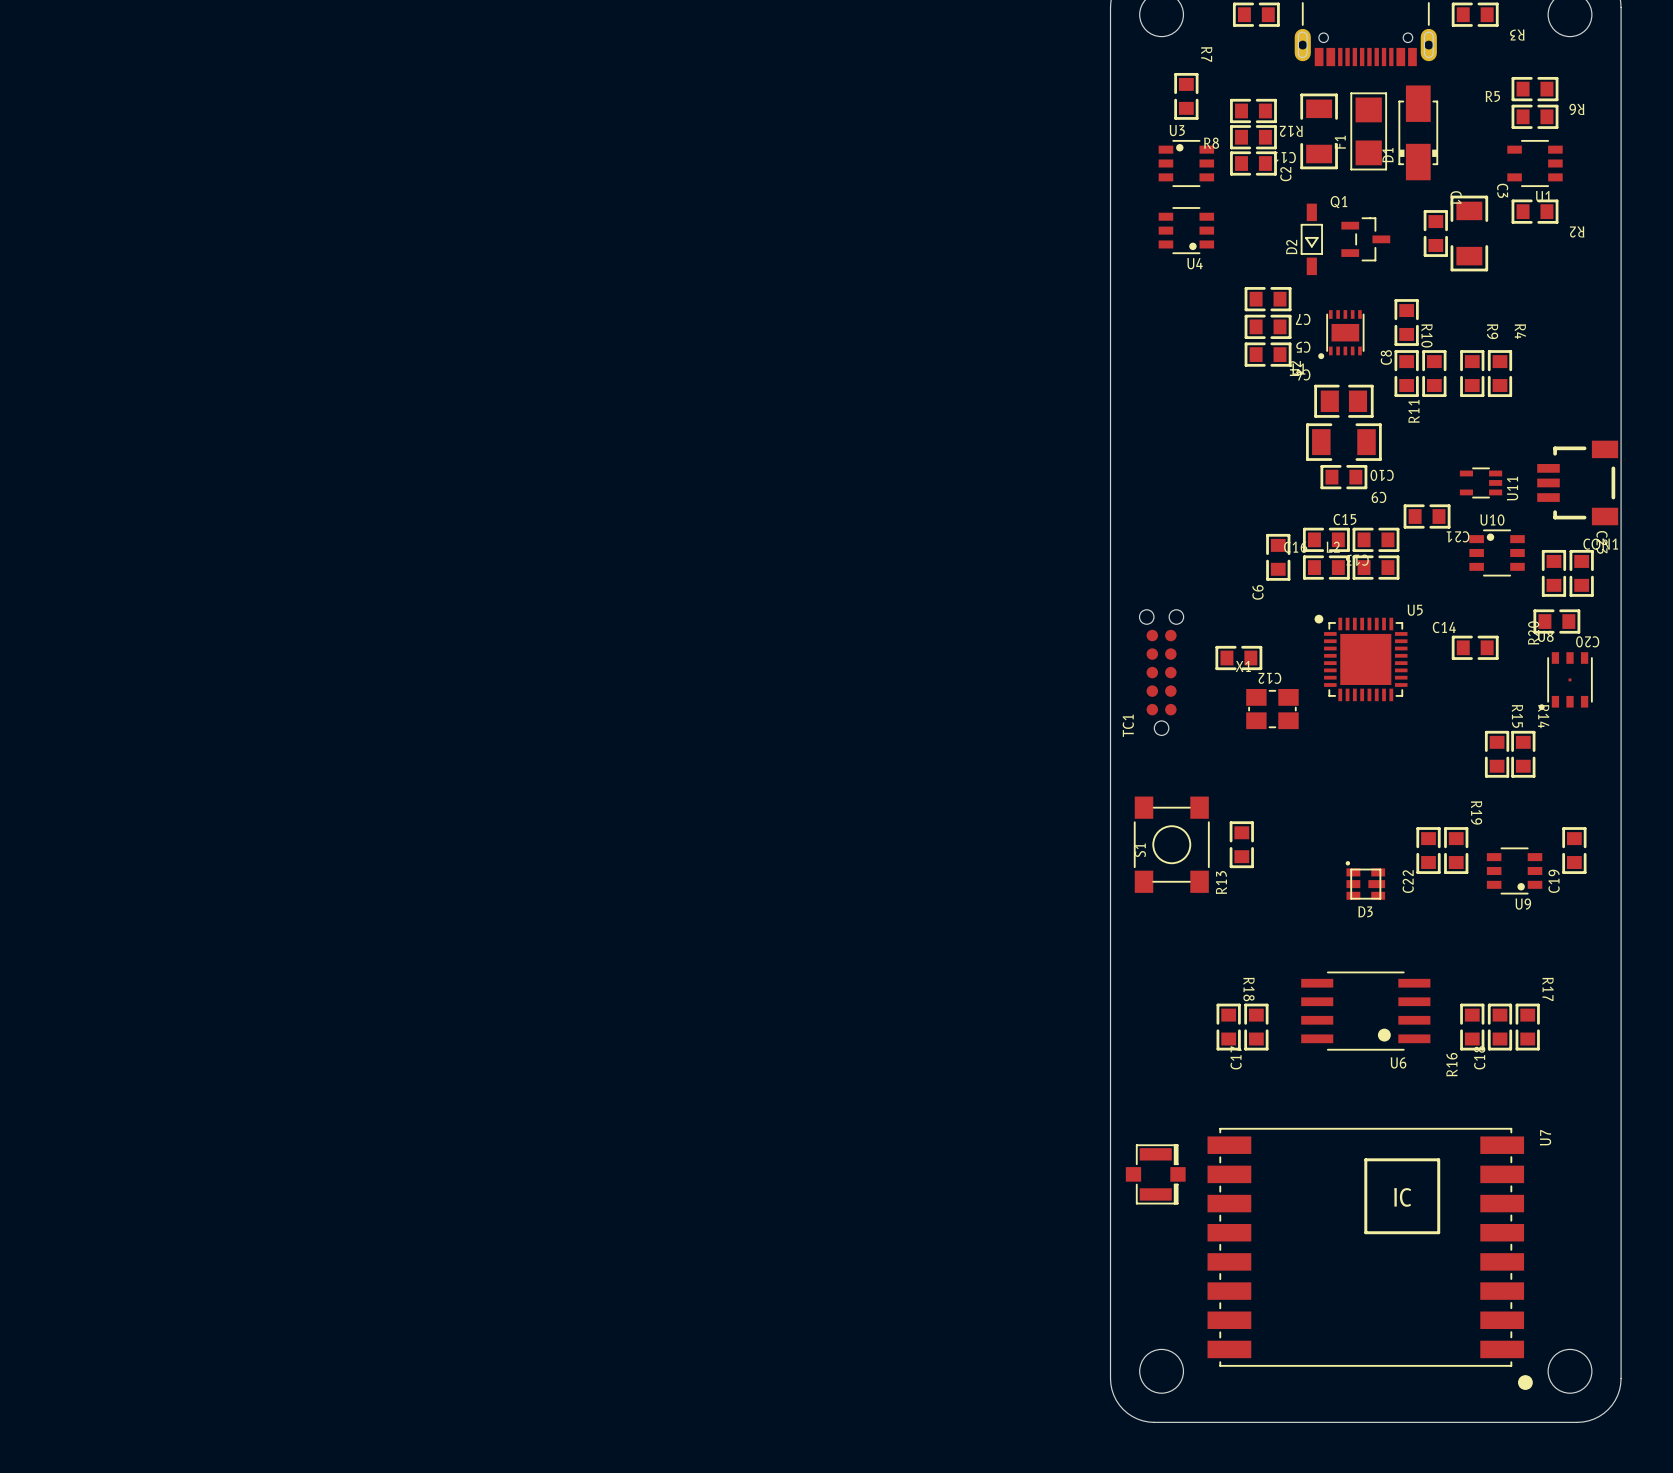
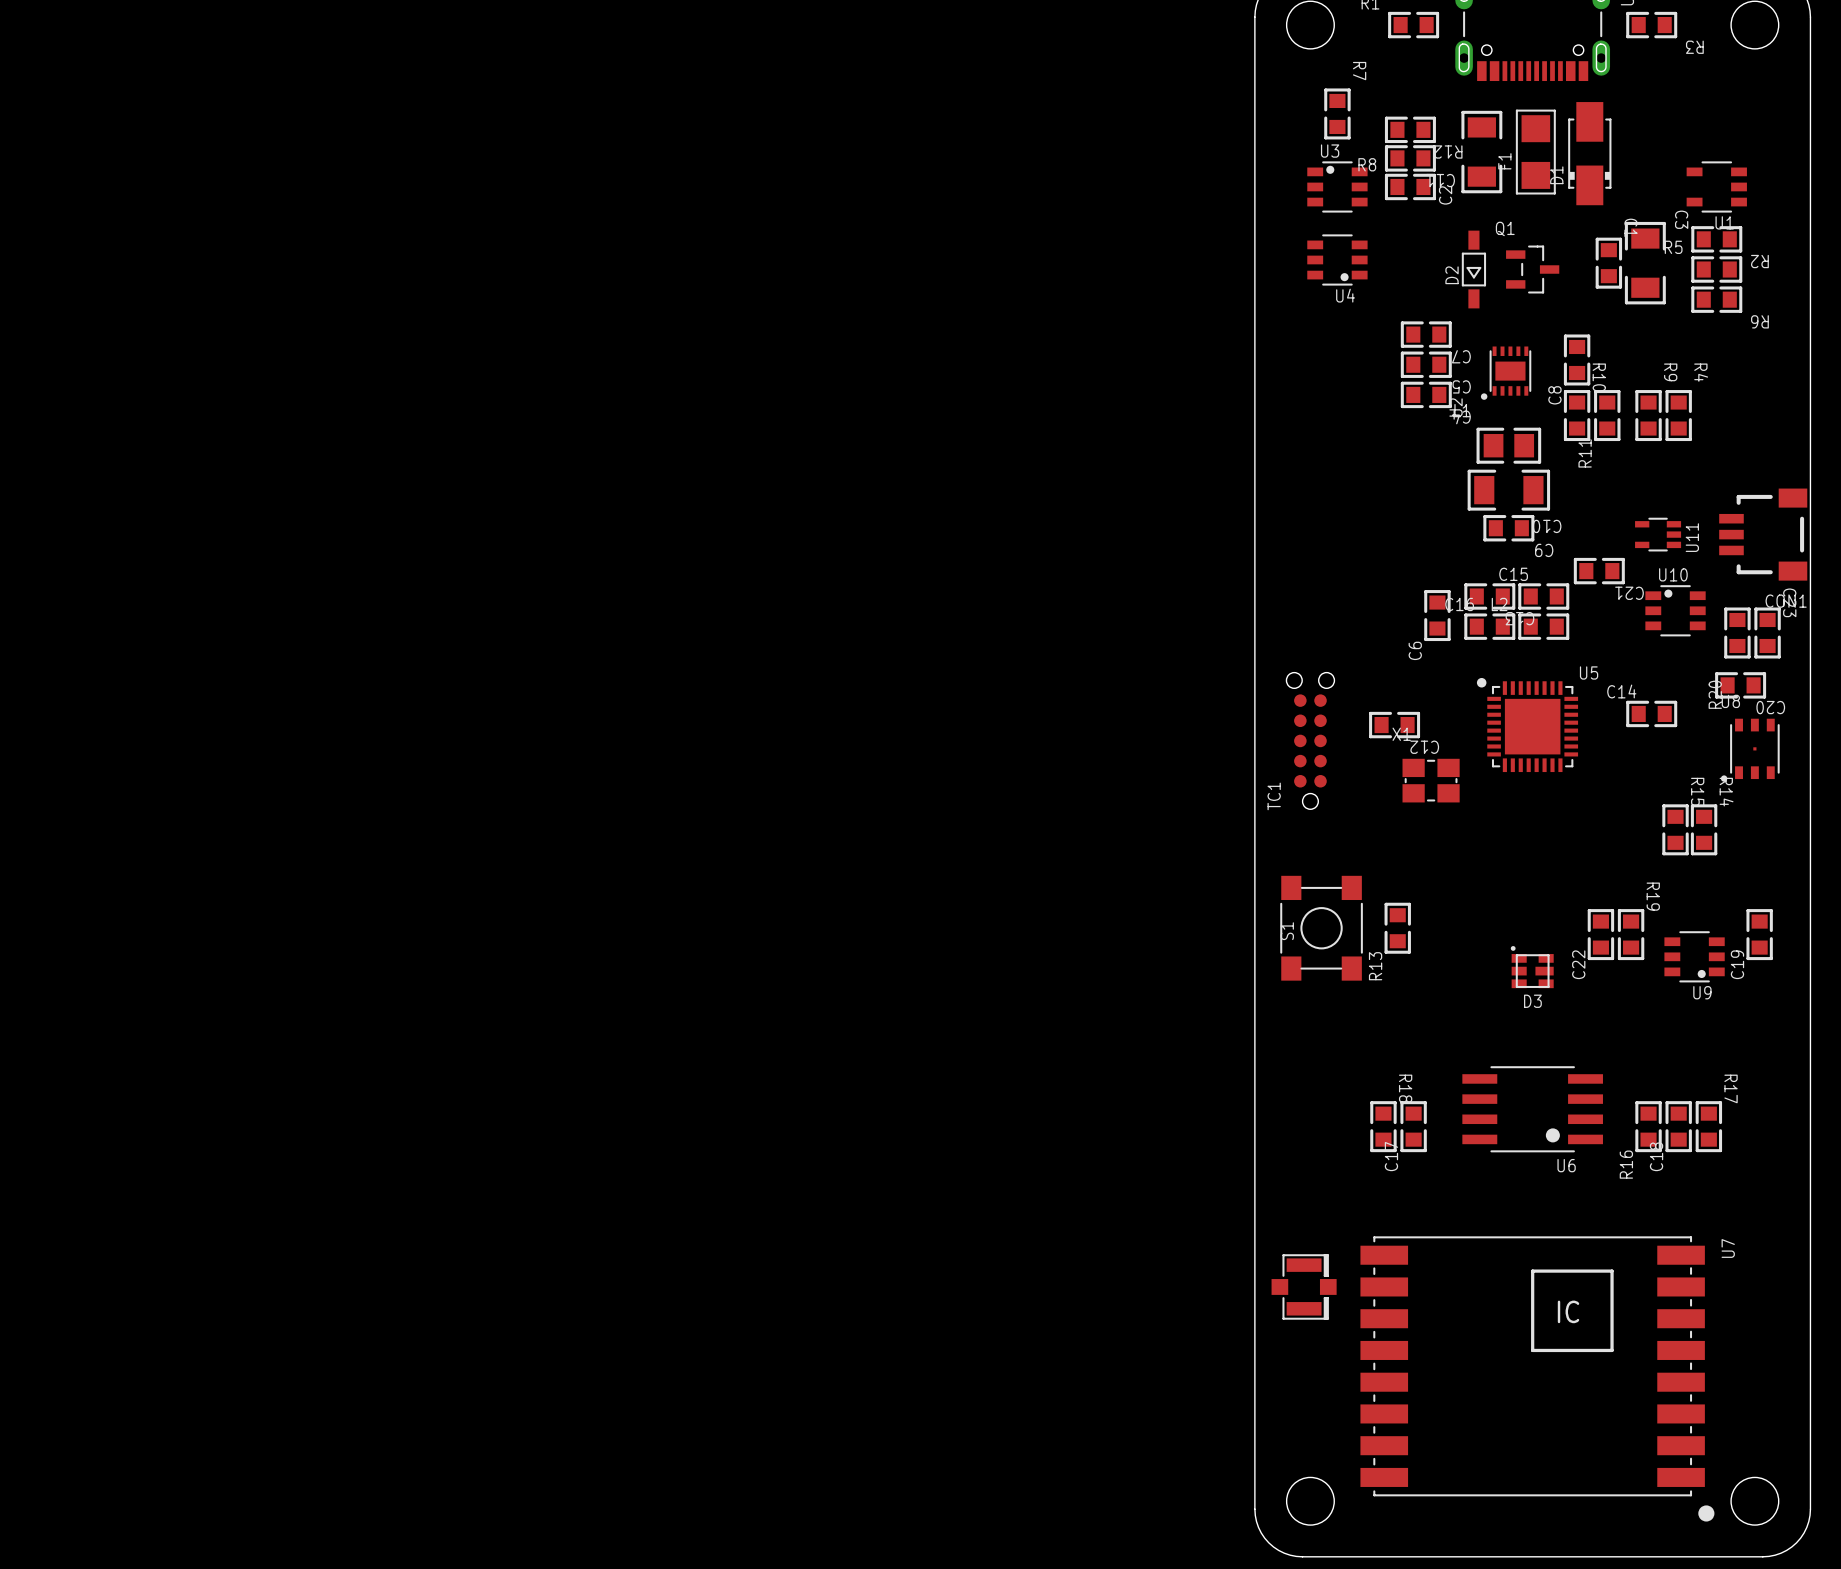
R6 position: (1535, 89) -> (1716, 299)
R5 position: (1535, 116) -> (1716, 269)

